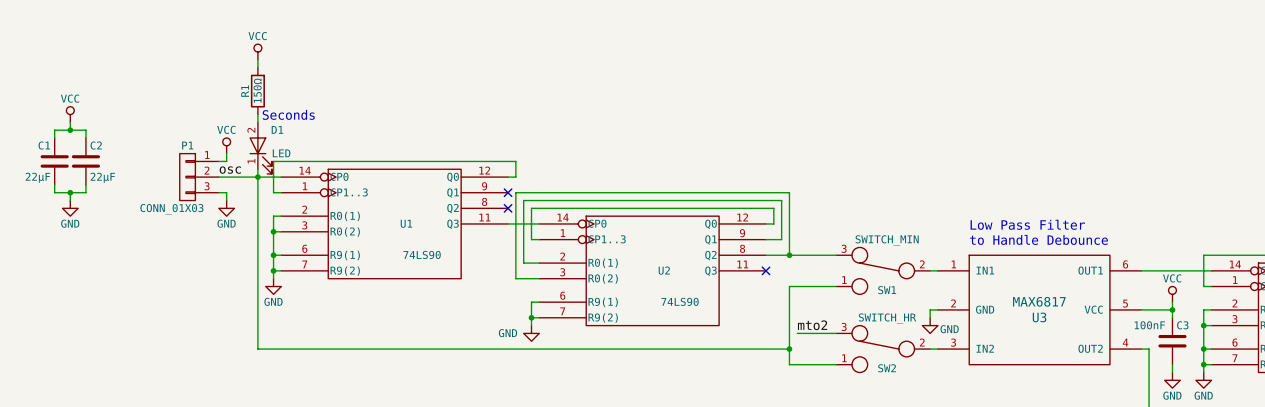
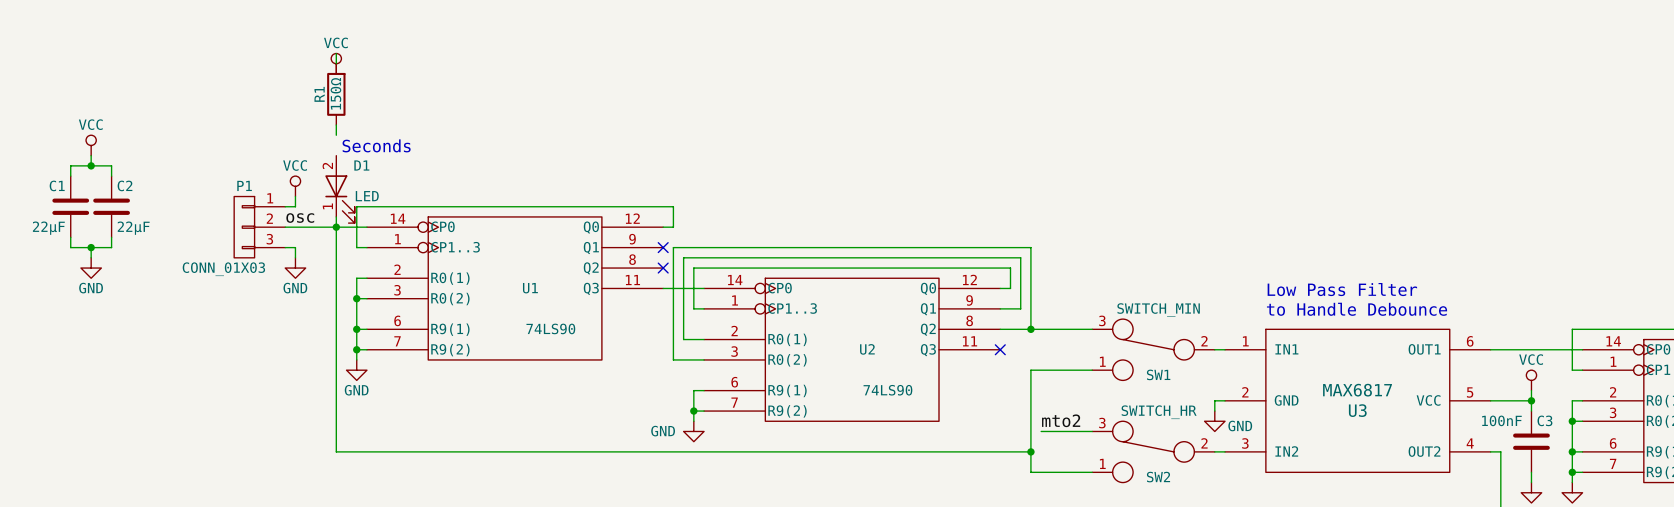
wire: (257, 59) (257, 67) -> (336, 53) (336, 63)
R1 position: (257, 91) -> (336, 94)
wire: (257, 114) (257, 122) -> (336, 125) (336, 135)

